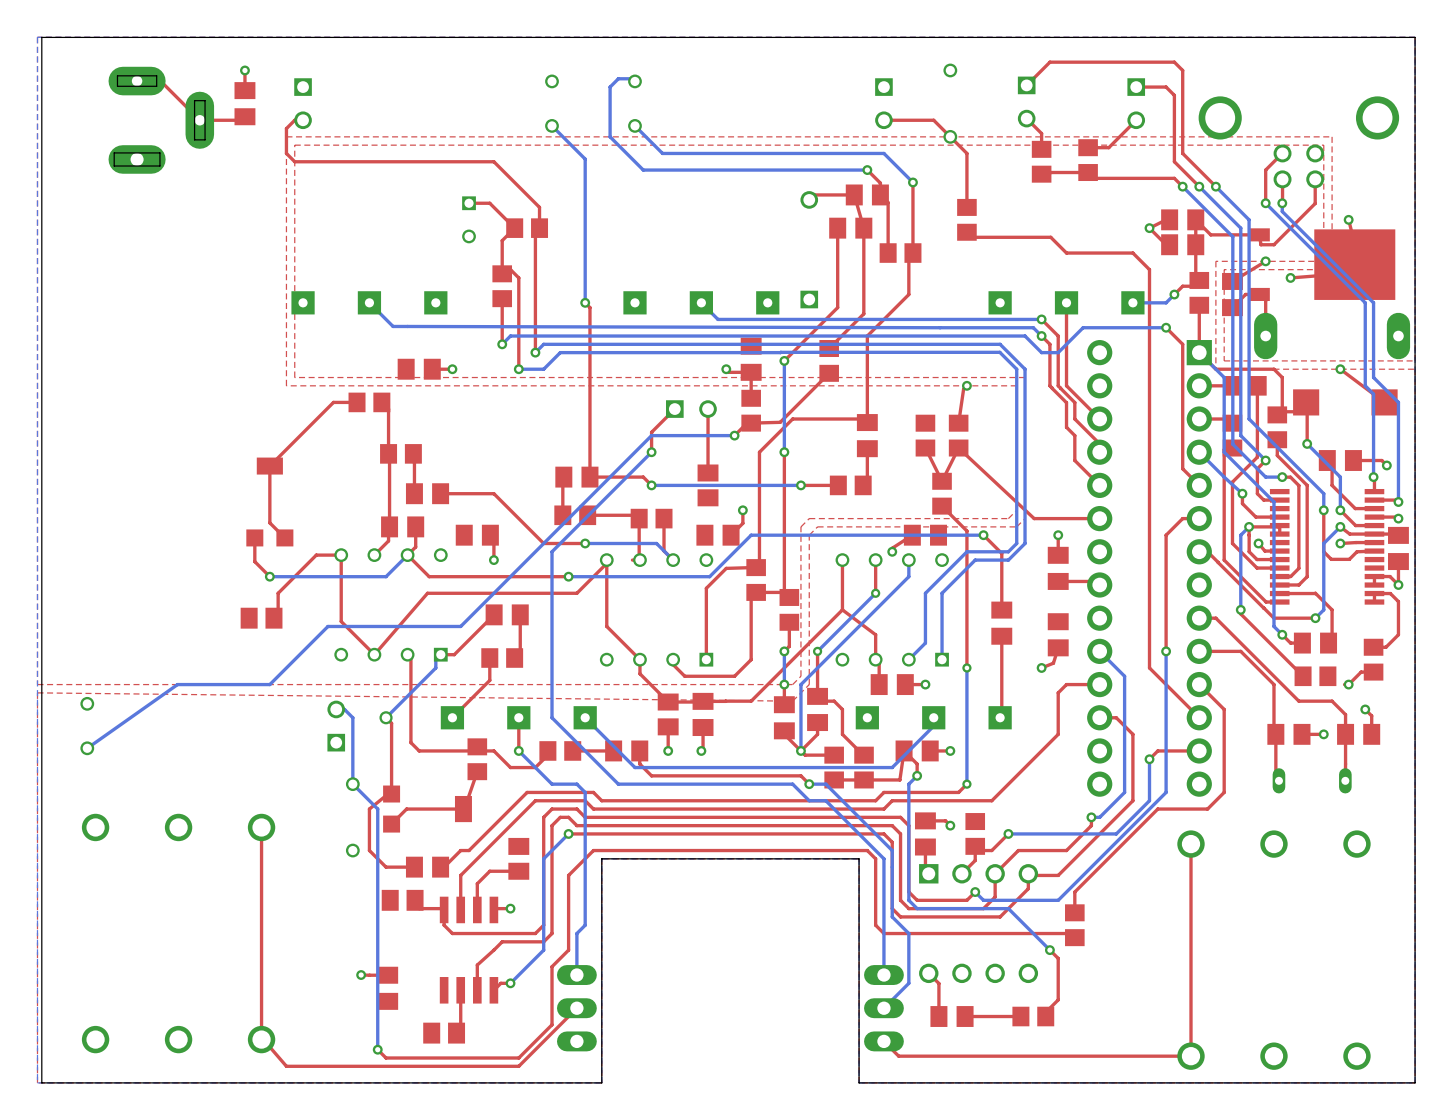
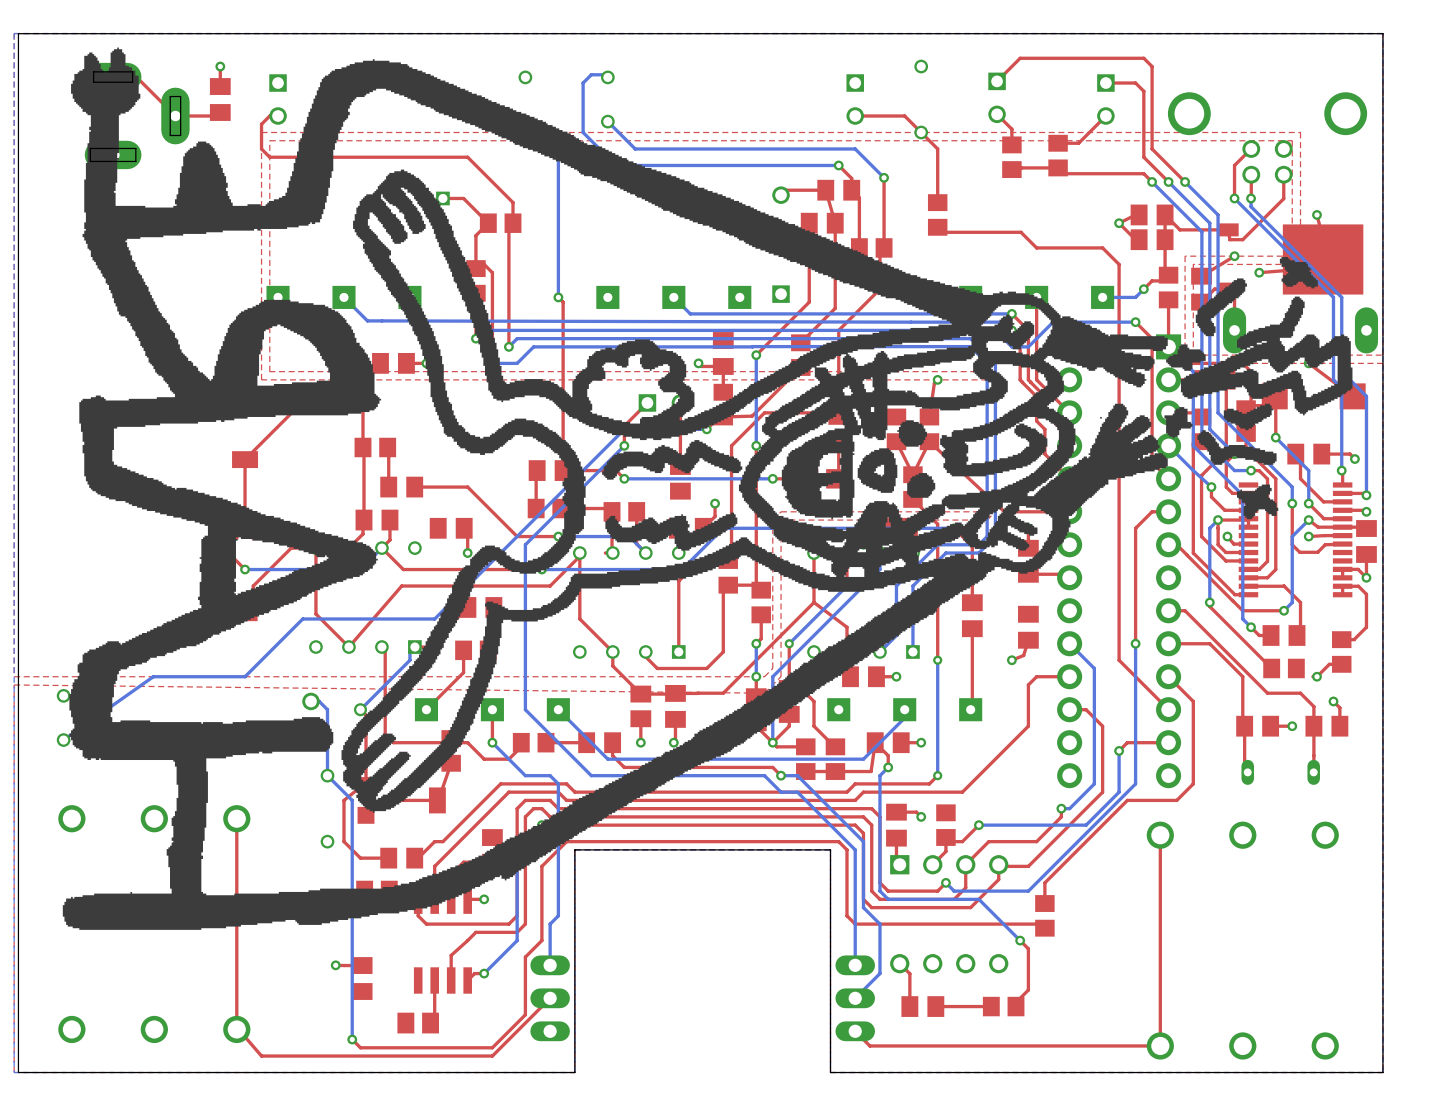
drawing: none -> [62, 47, 1353, 930]
drawing: none -> [1237, 484, 1279, 520]

